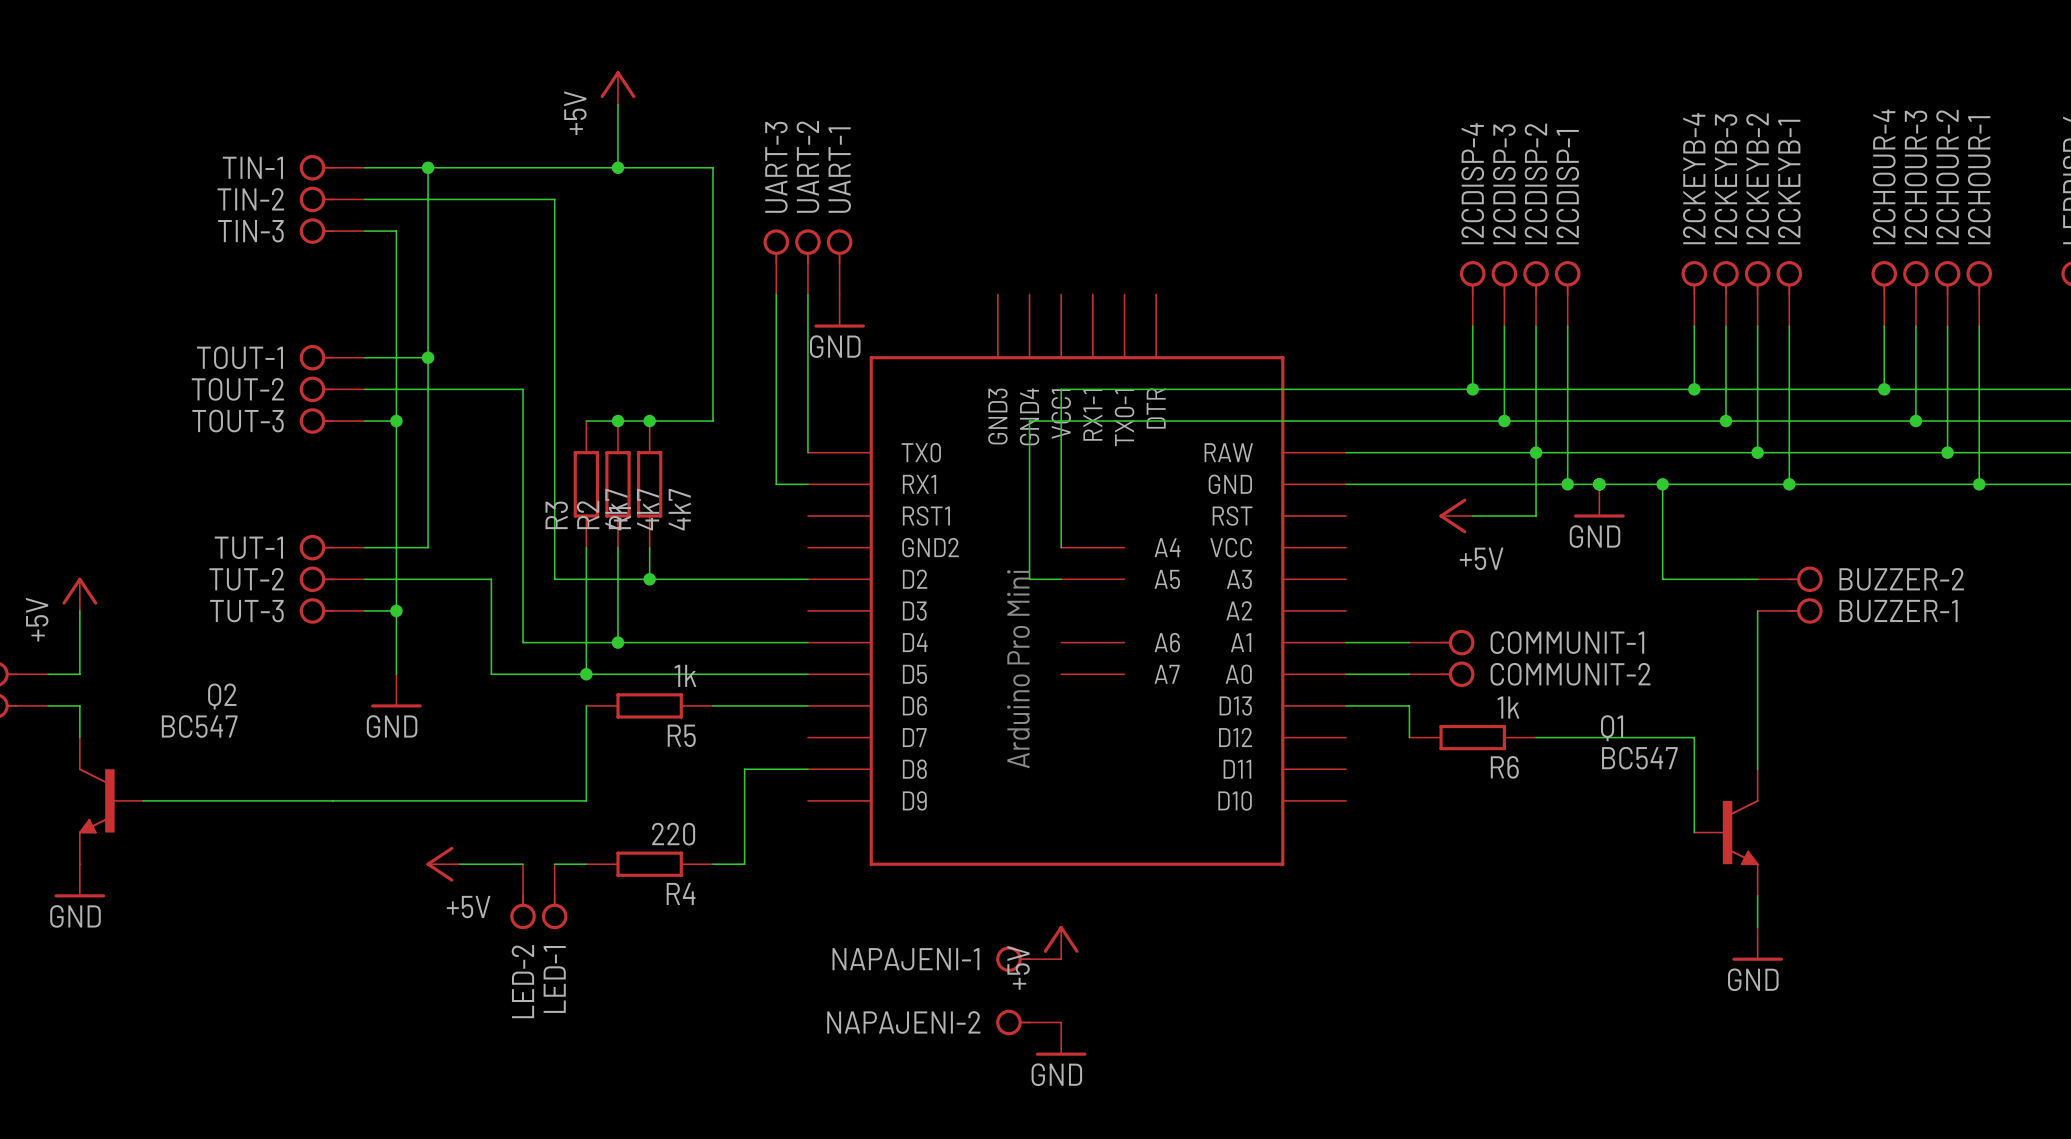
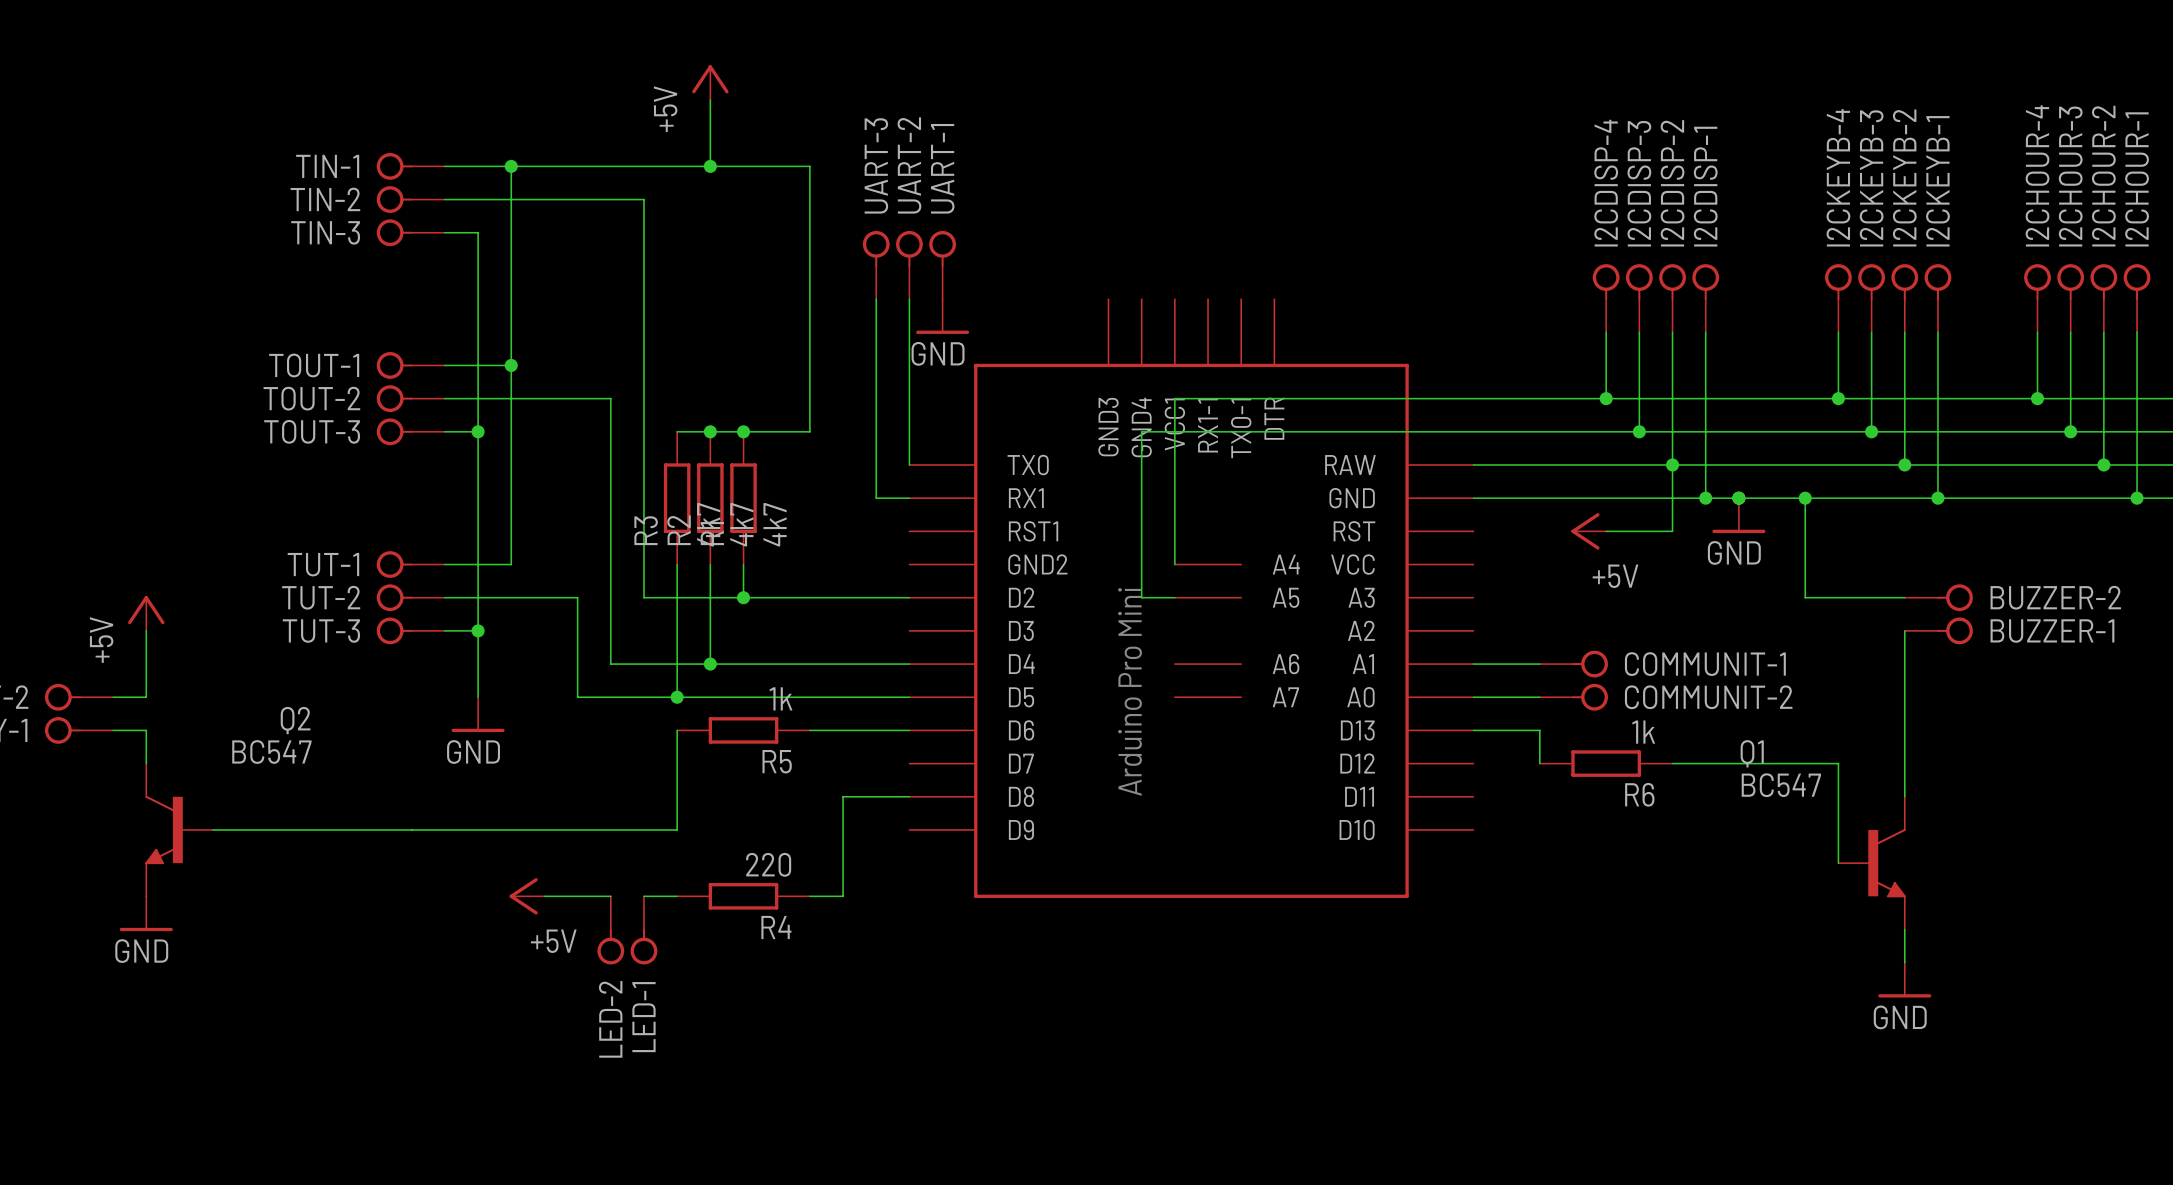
power symbol: +5V (1061, 942) -> none
NAPAJENI-1: (1028, 959) -> none
NAPAJENI-2: (1028, 1022) -> none
power symbol: GND (1061, 1039) -> none

